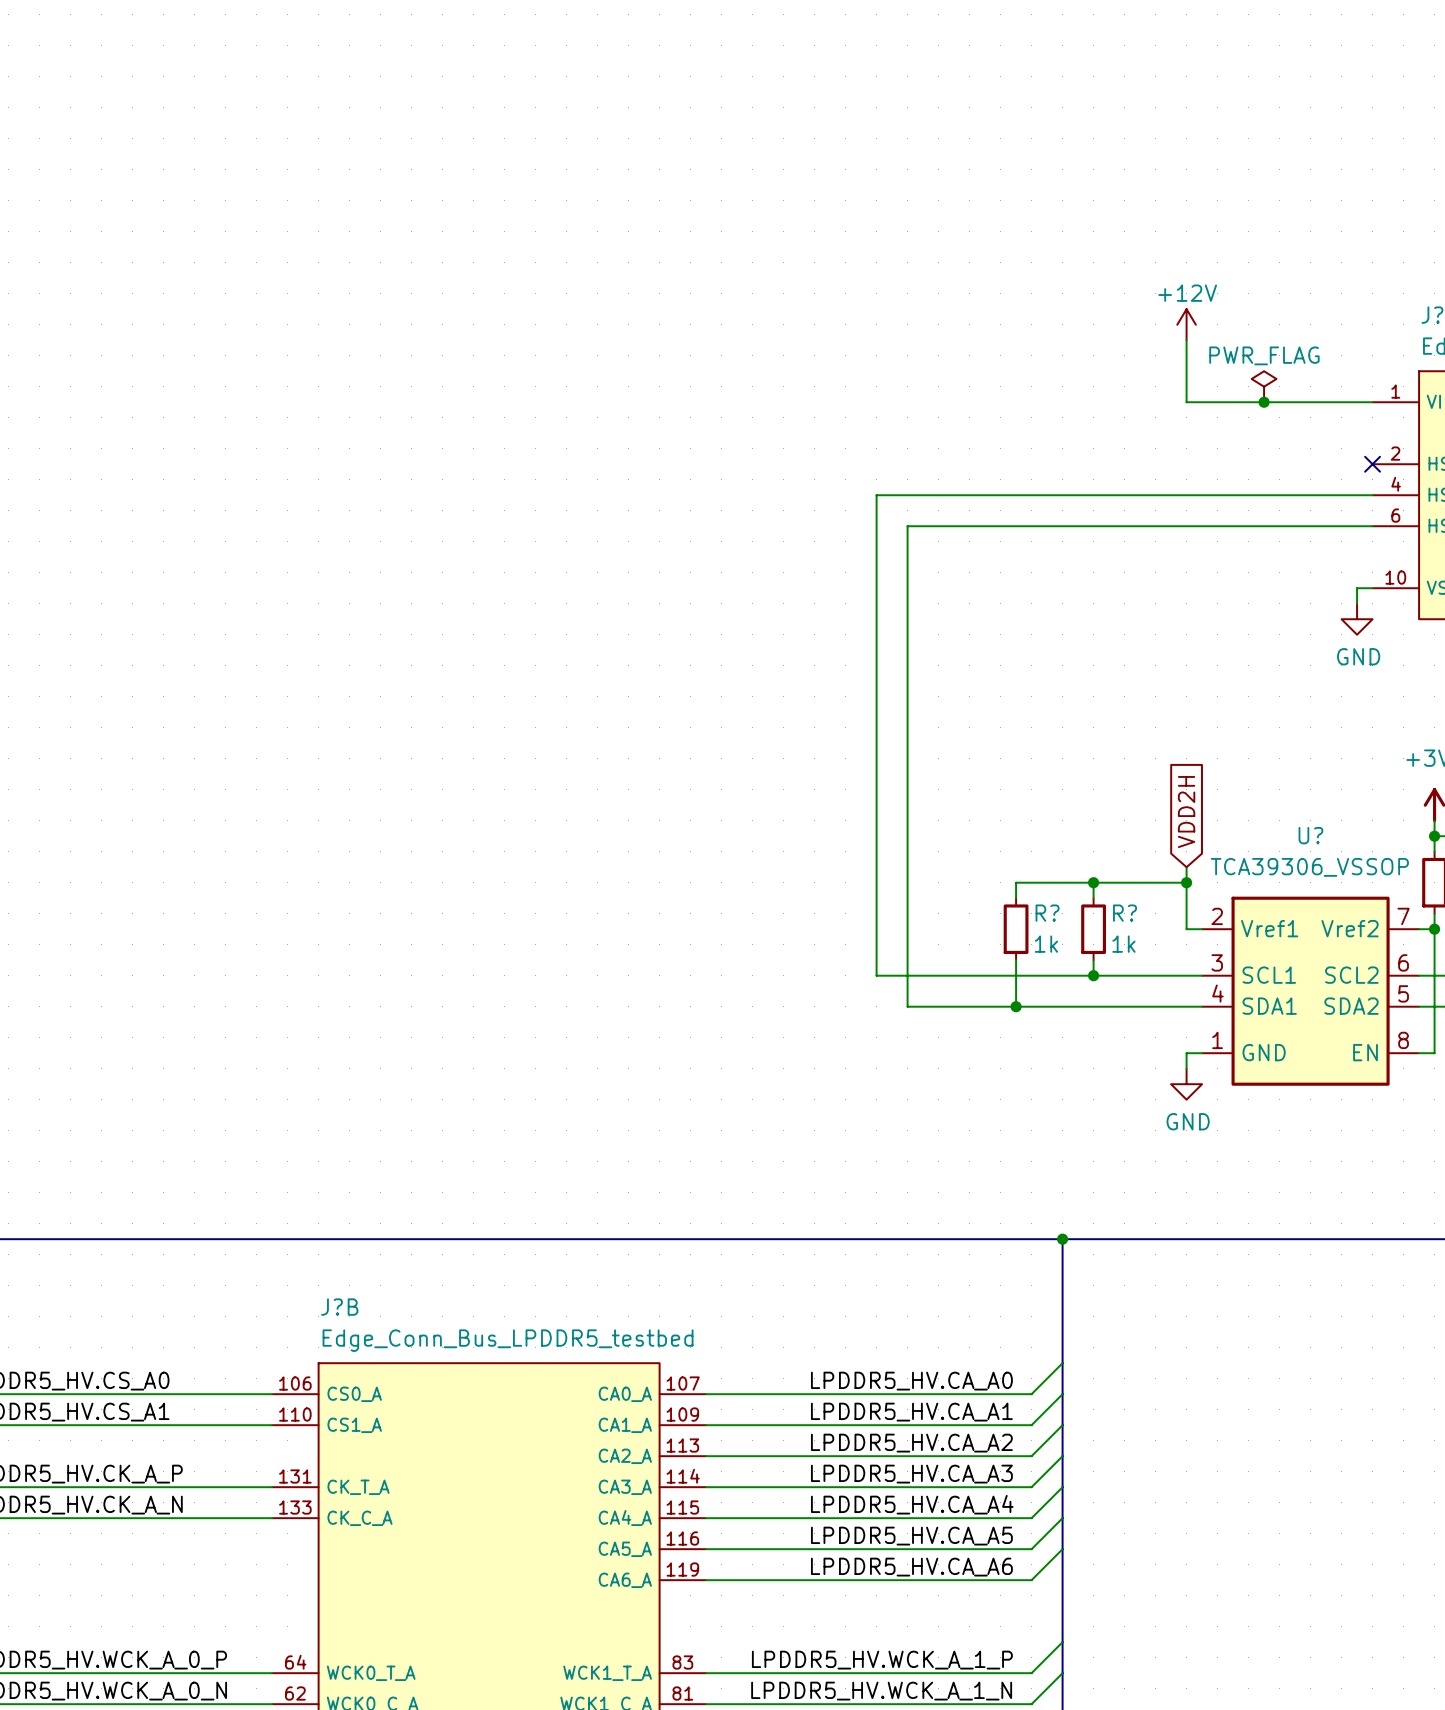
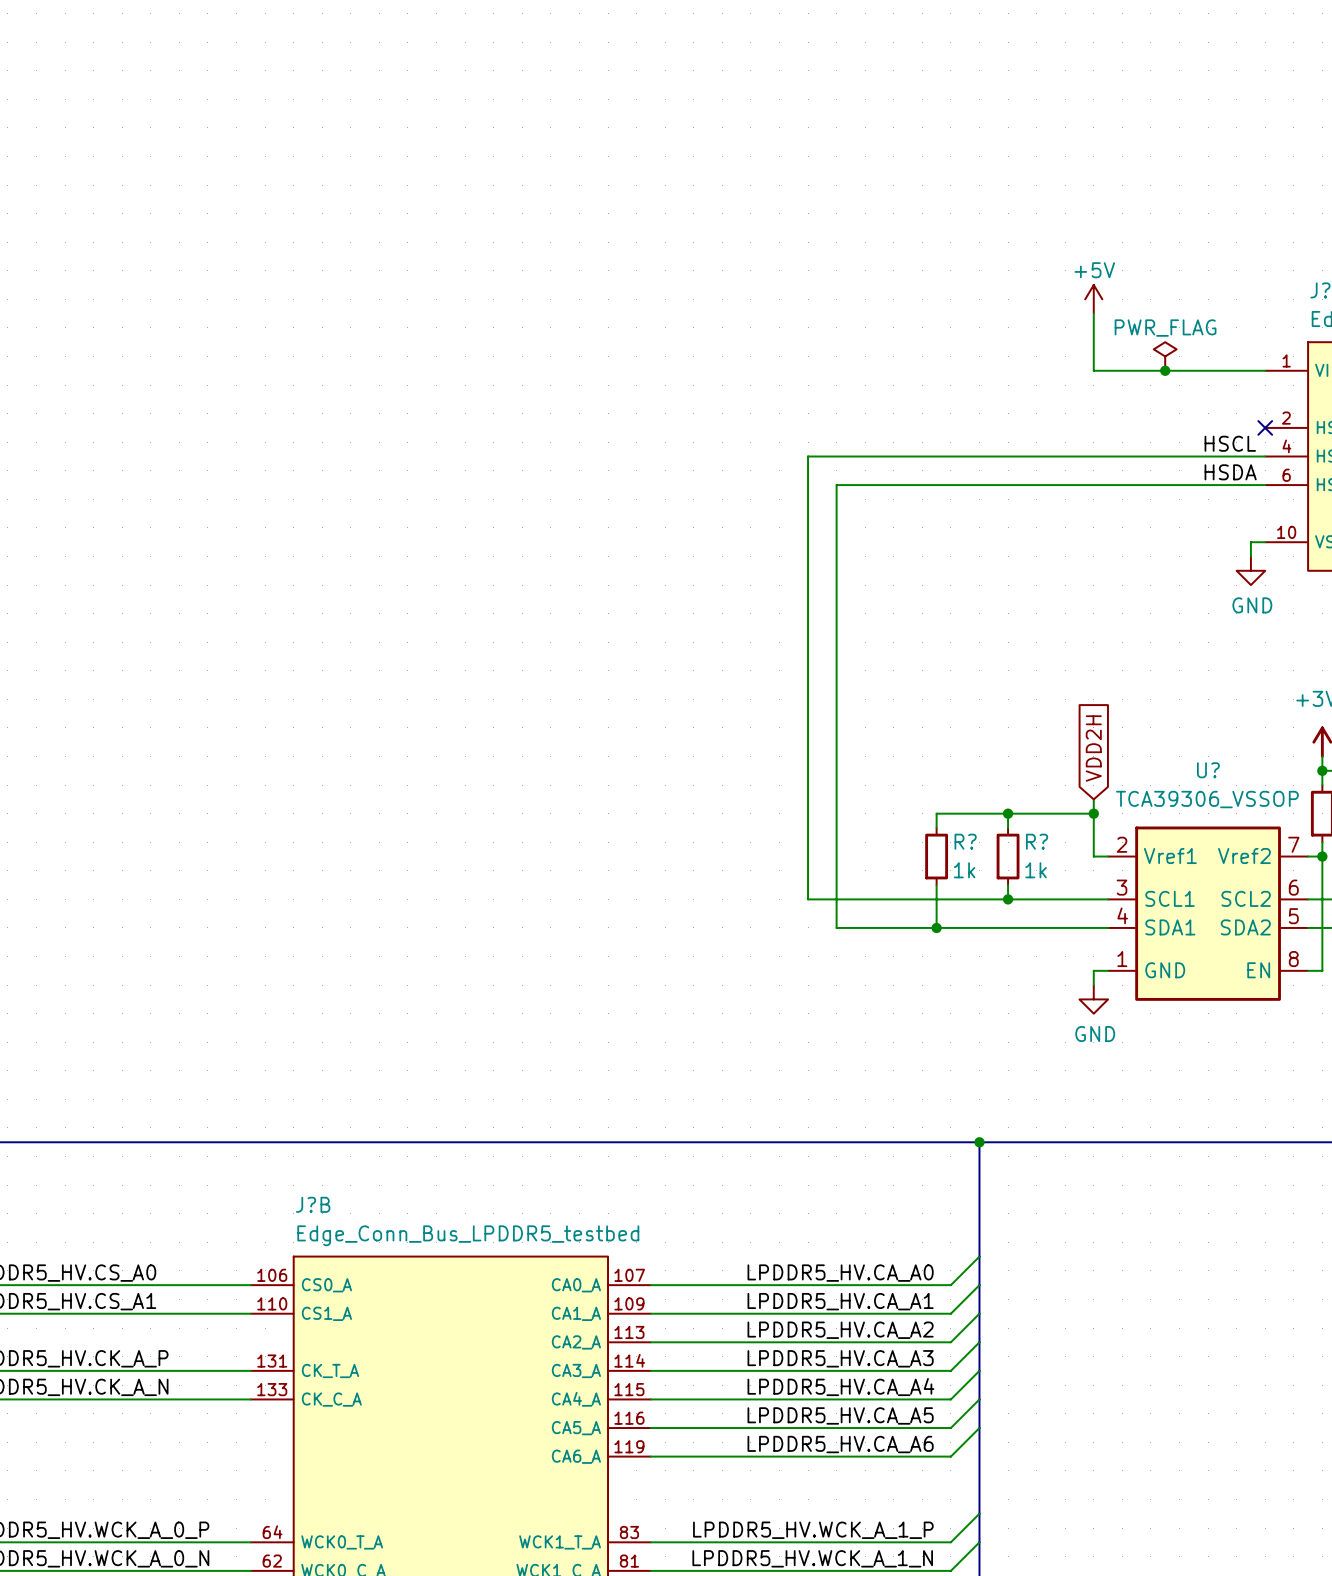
power symbol: +12V (1186, 324) -> +5V (1093, 299)
label: none -> HSCL (1230, 443)
label: none -> HSDA (1230, 472)

